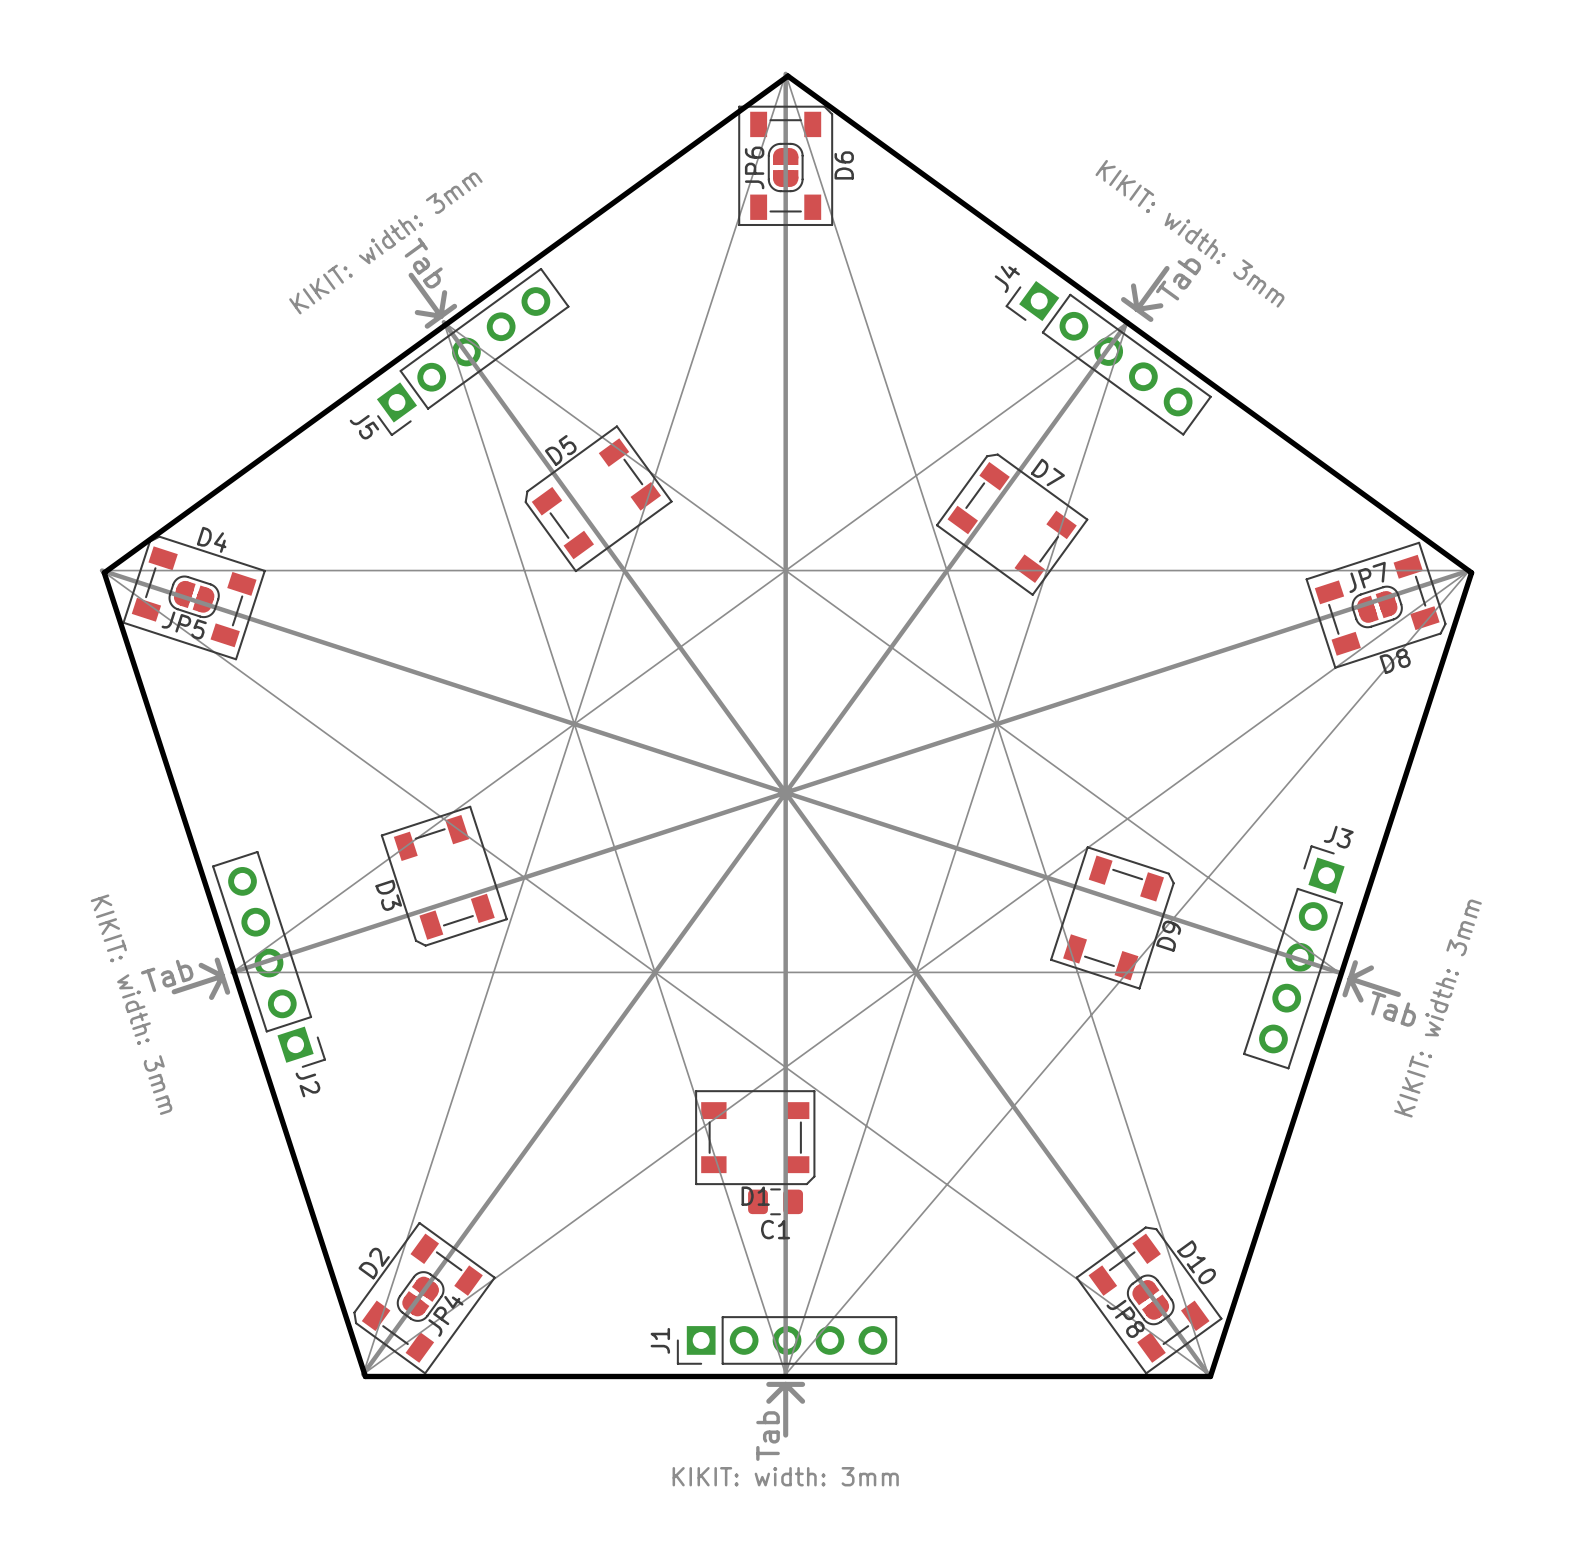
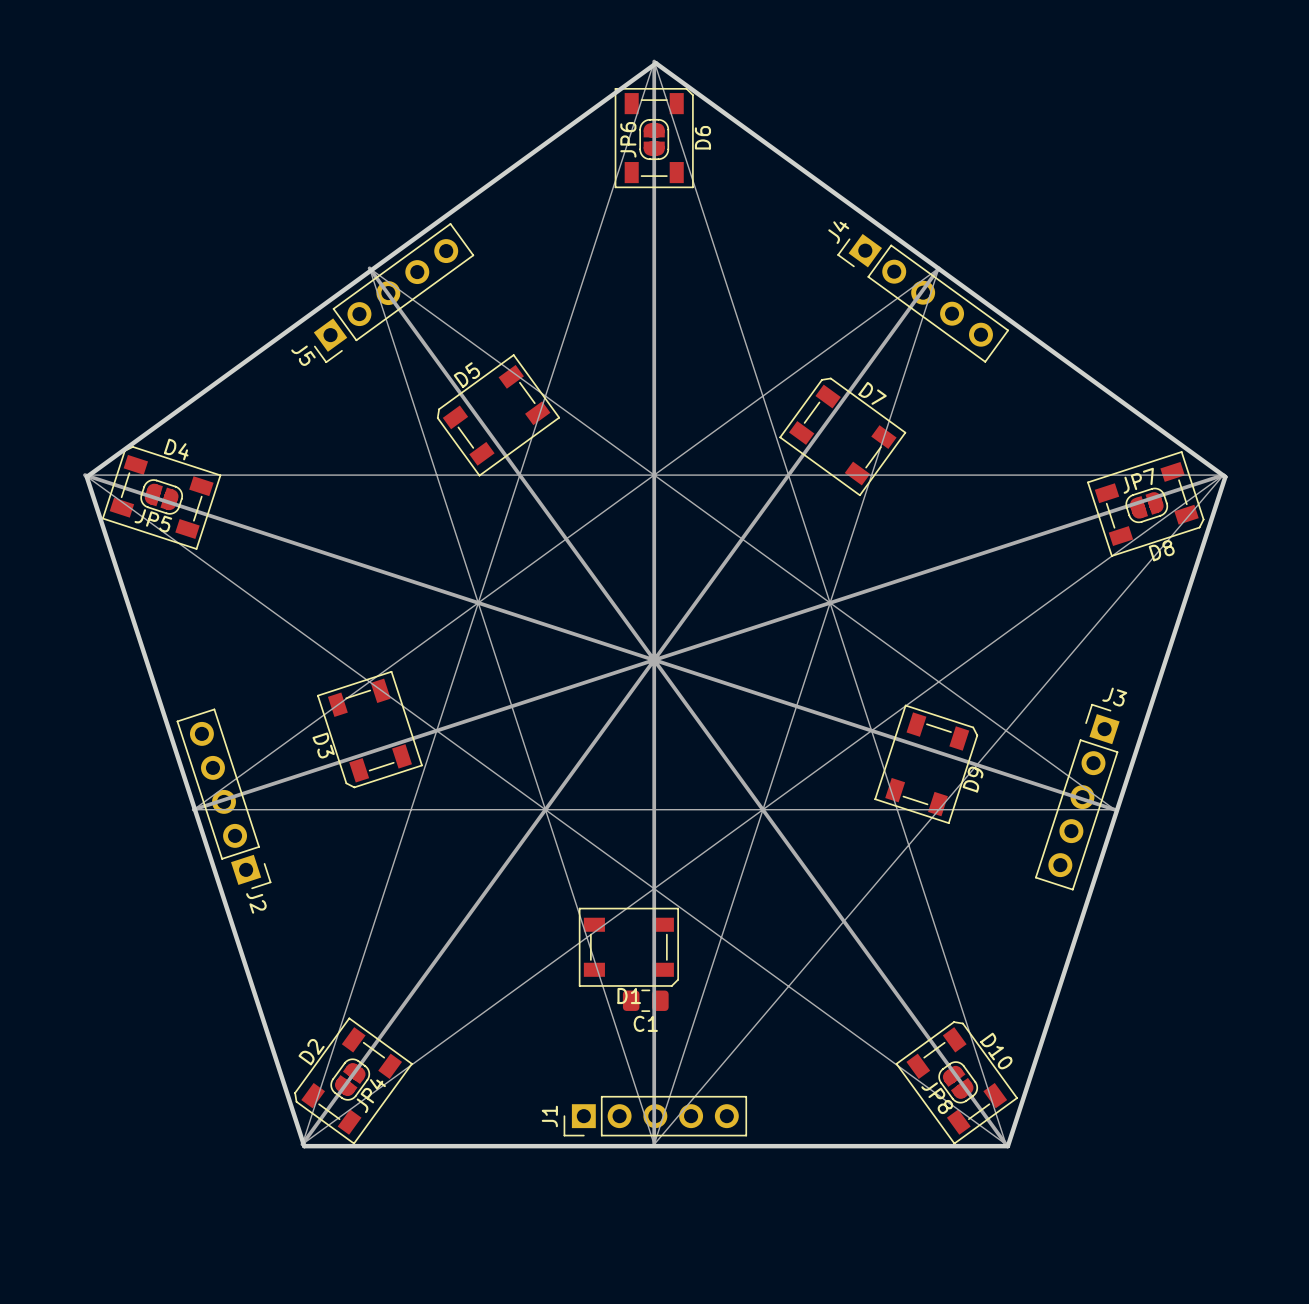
drawing: [1121, 265, 1170, 322] -> none
drawing: [408, 272, 458, 329] -> none
drawing: [171, 957, 231, 1000] -> none
drawing: [1342, 960, 1401, 1003] -> none
drawing: [766, 1381, 806, 1438] -> none

